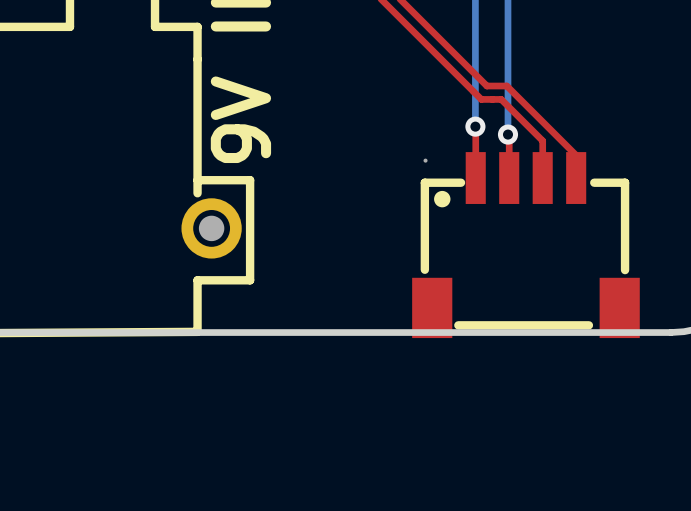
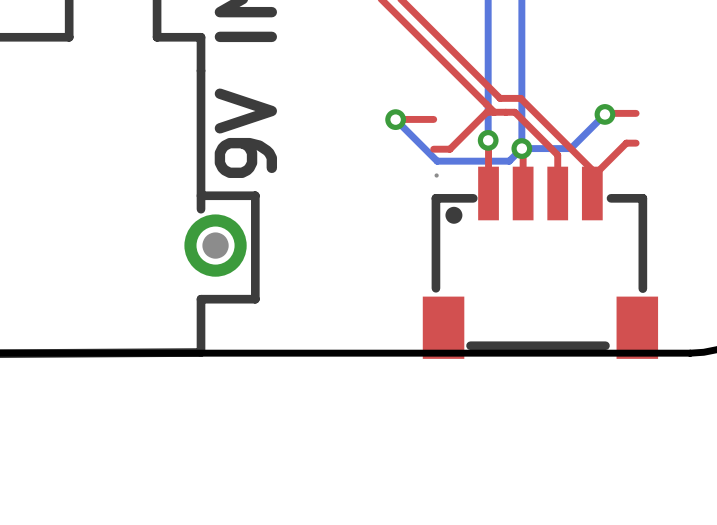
top track: none -> (494, 112) (486, 112) (449, 149) (433, 149)
top track: none -> (636, 113) (604, 114)
bottom track: none -> (604, 114) (570, 148) (521, 148) (509, 161) (437, 161) (395, 119)
via: none -> (604, 114)
via: none -> (395, 119)
top track: none -> (395, 119) (433, 119)
top track: none -> (636, 143) (626, 143) (592, 177)

